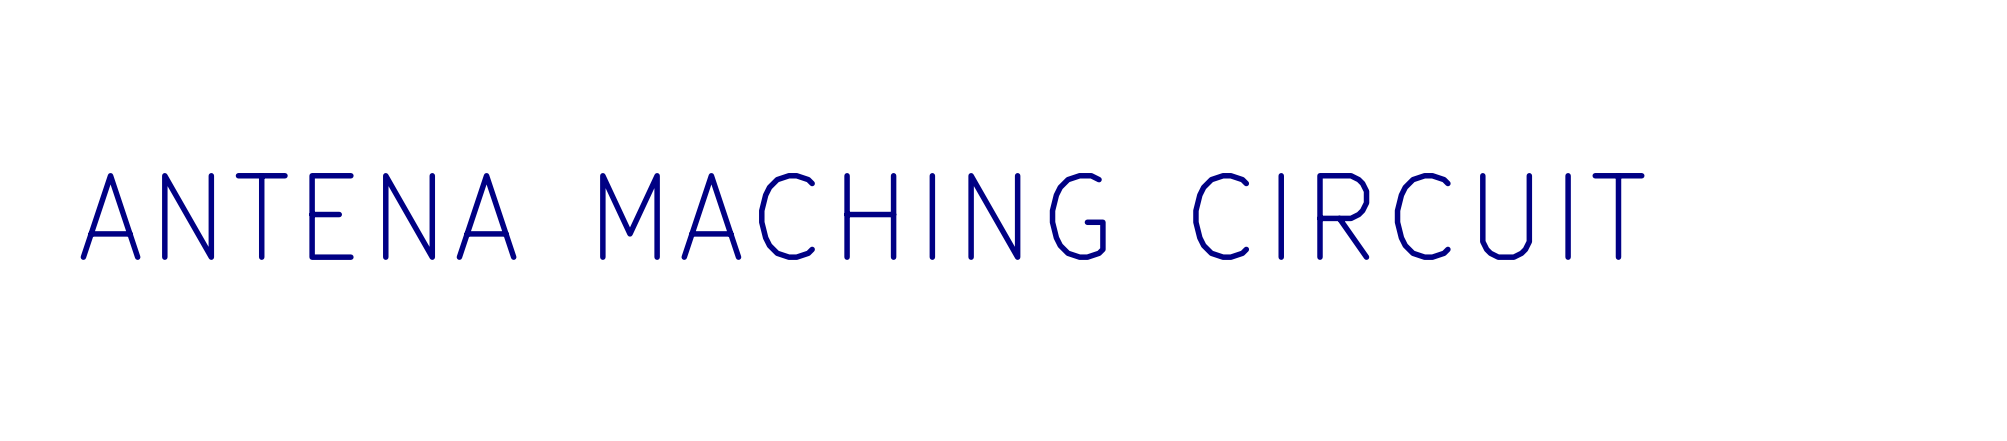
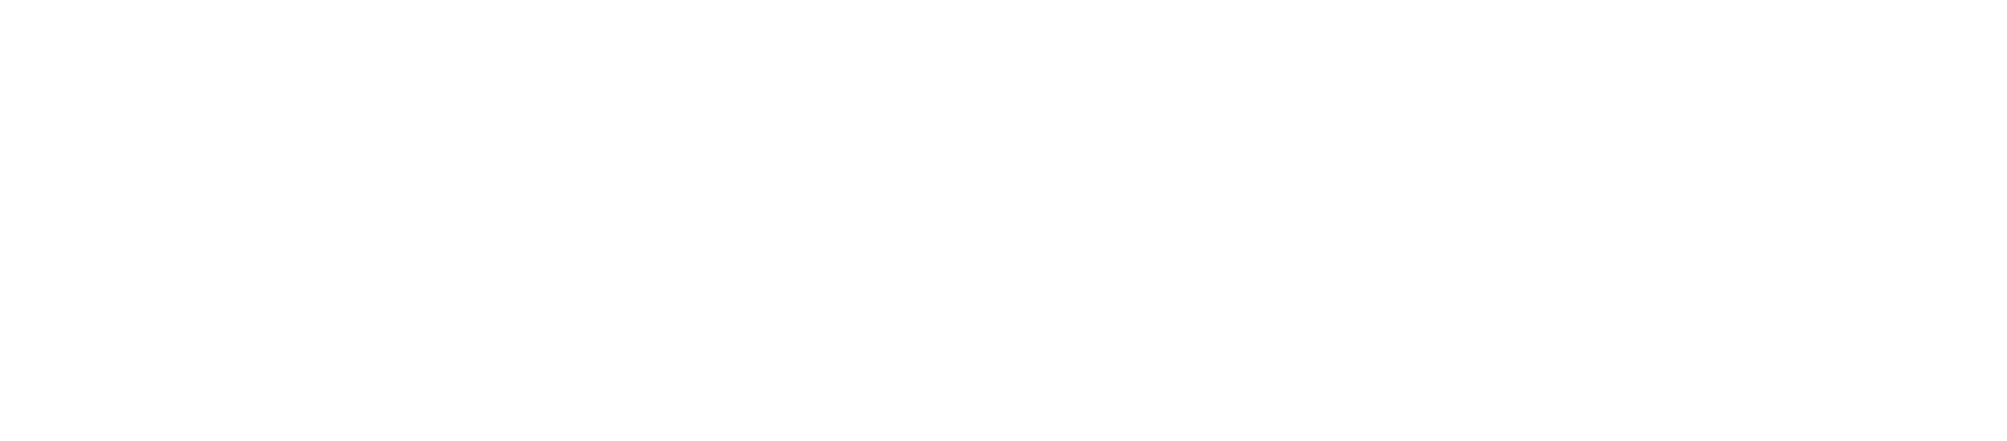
text: ANTENA MACHING CIRCUIT (862, 216) -> none

